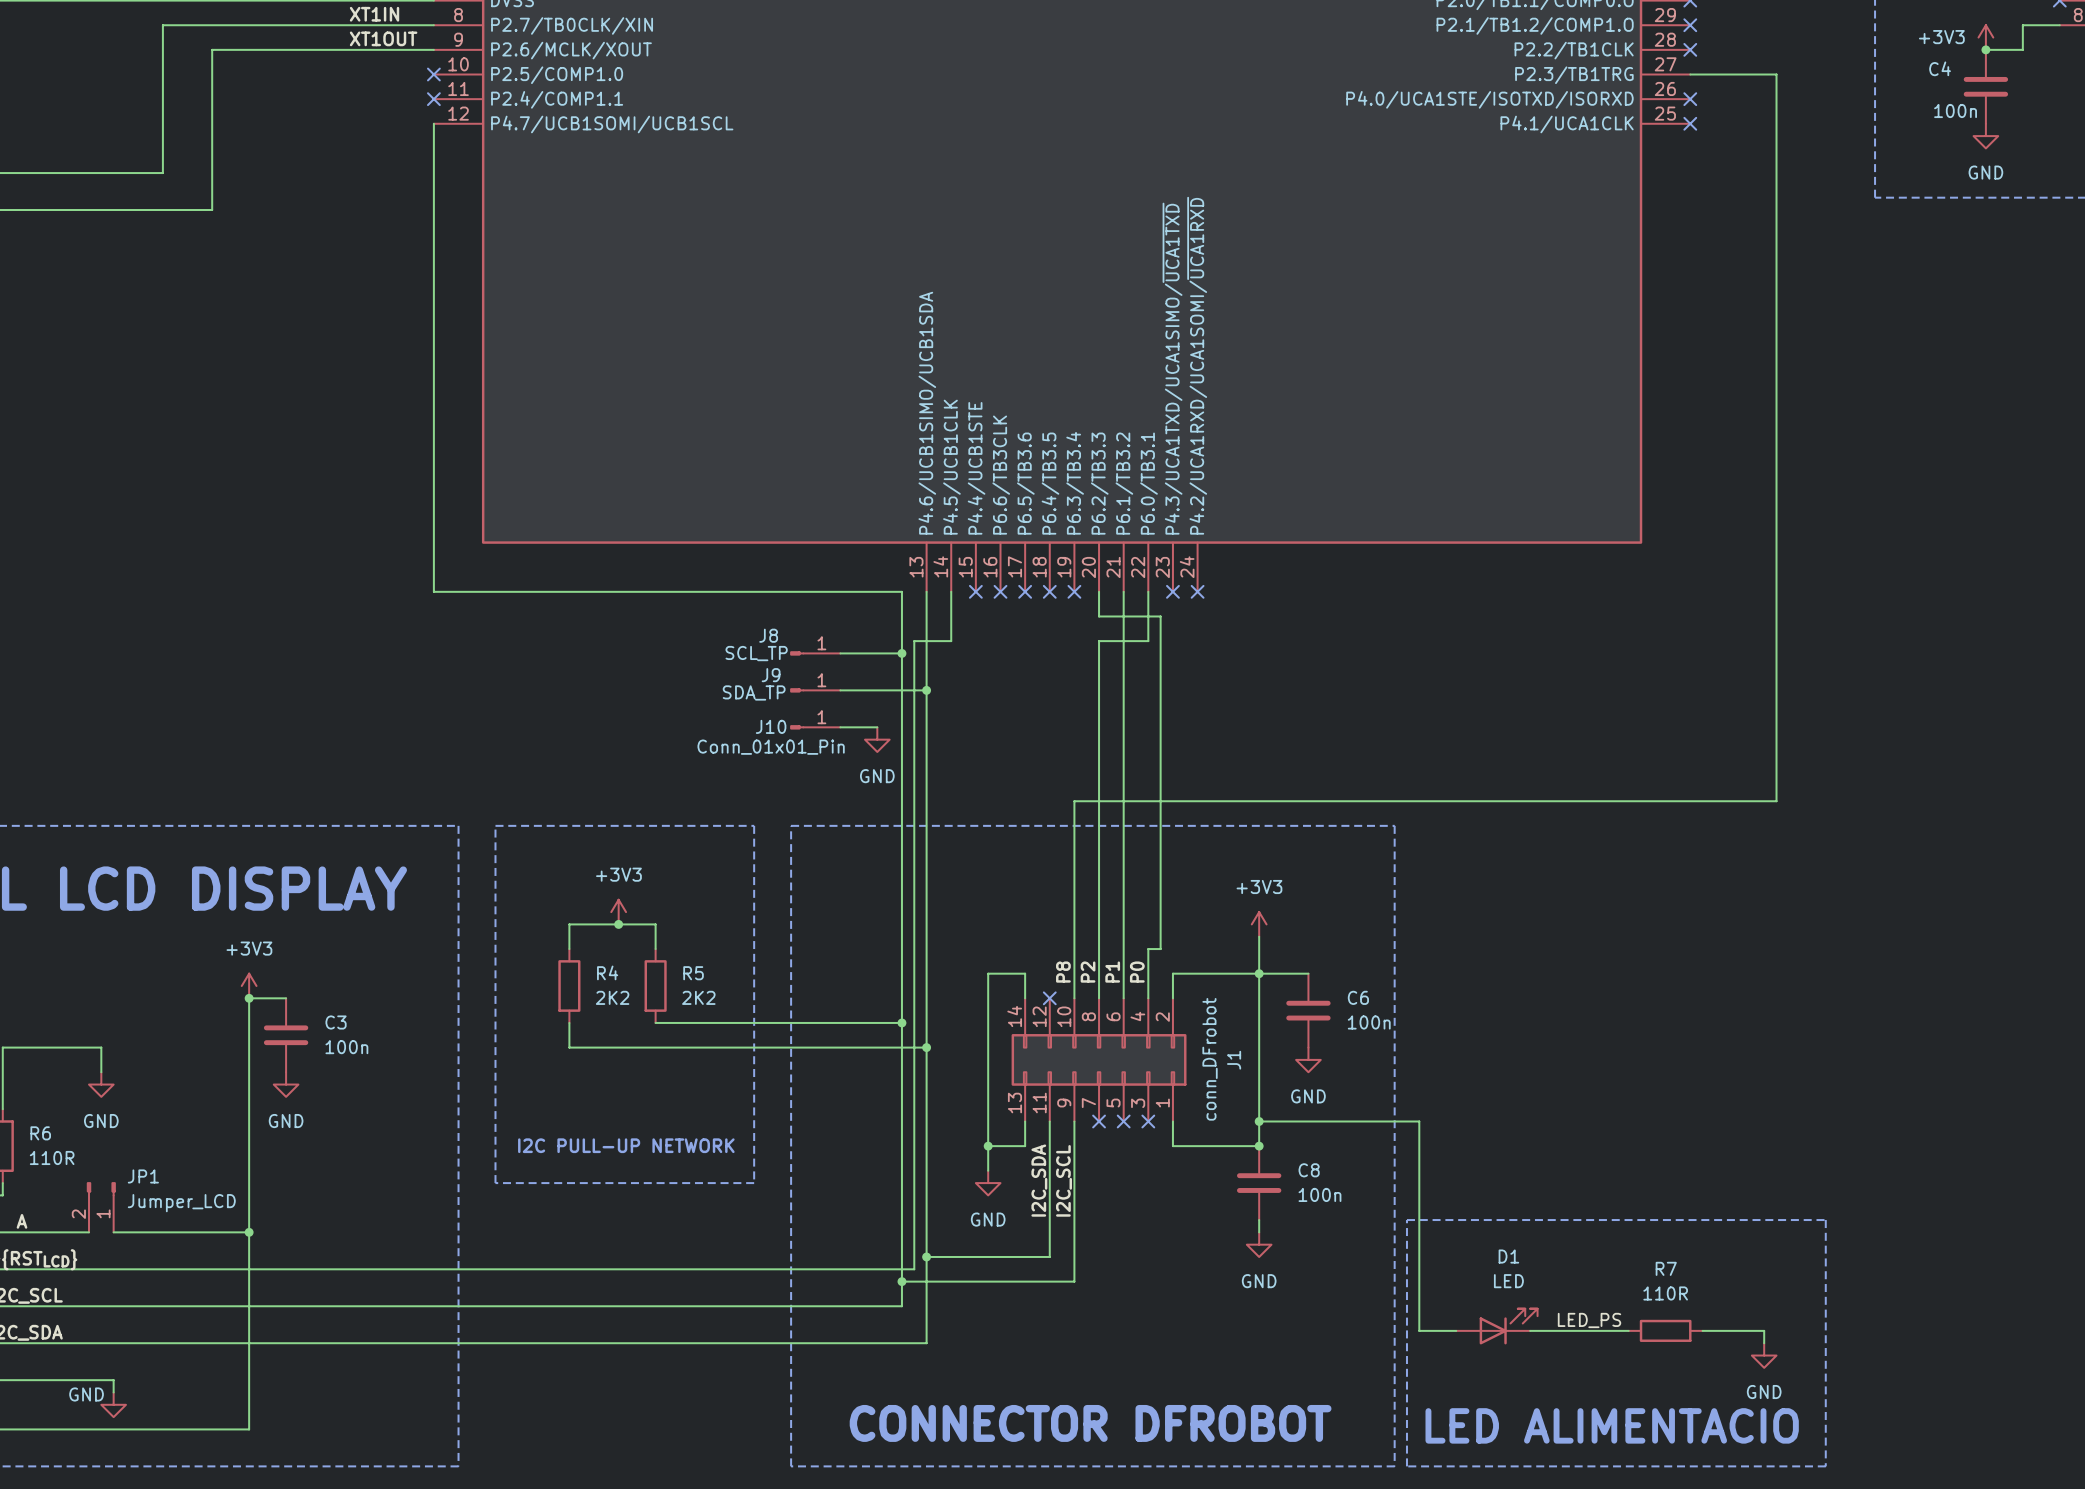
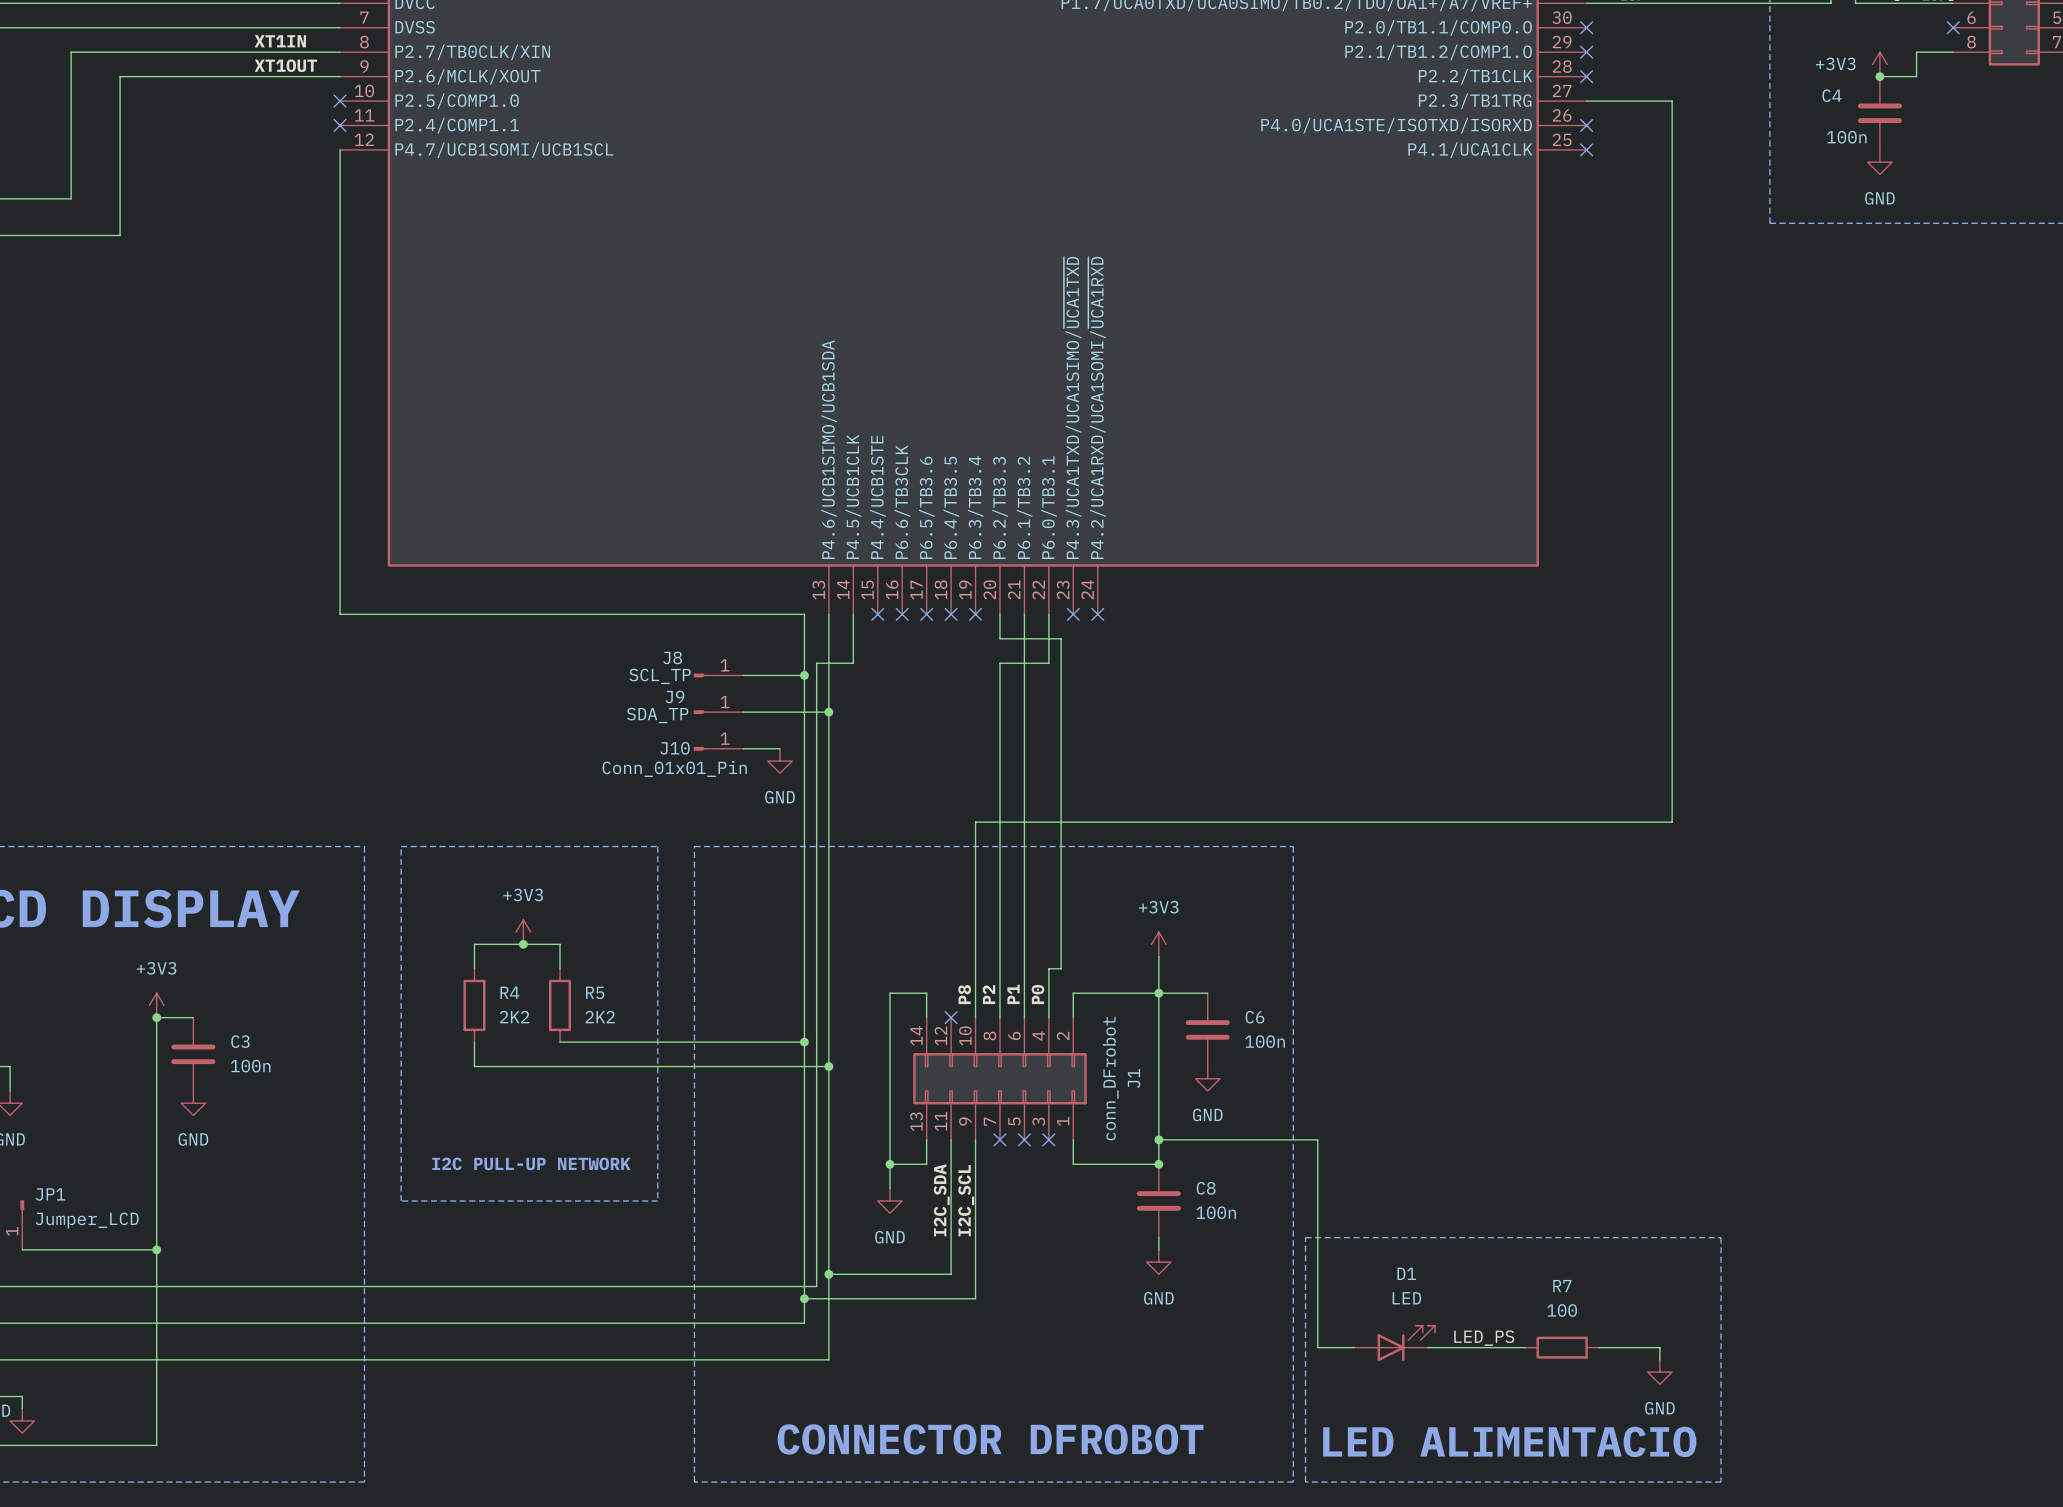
R7 value: 110R (1665, 1293) -> 100 (1562, 1310)

